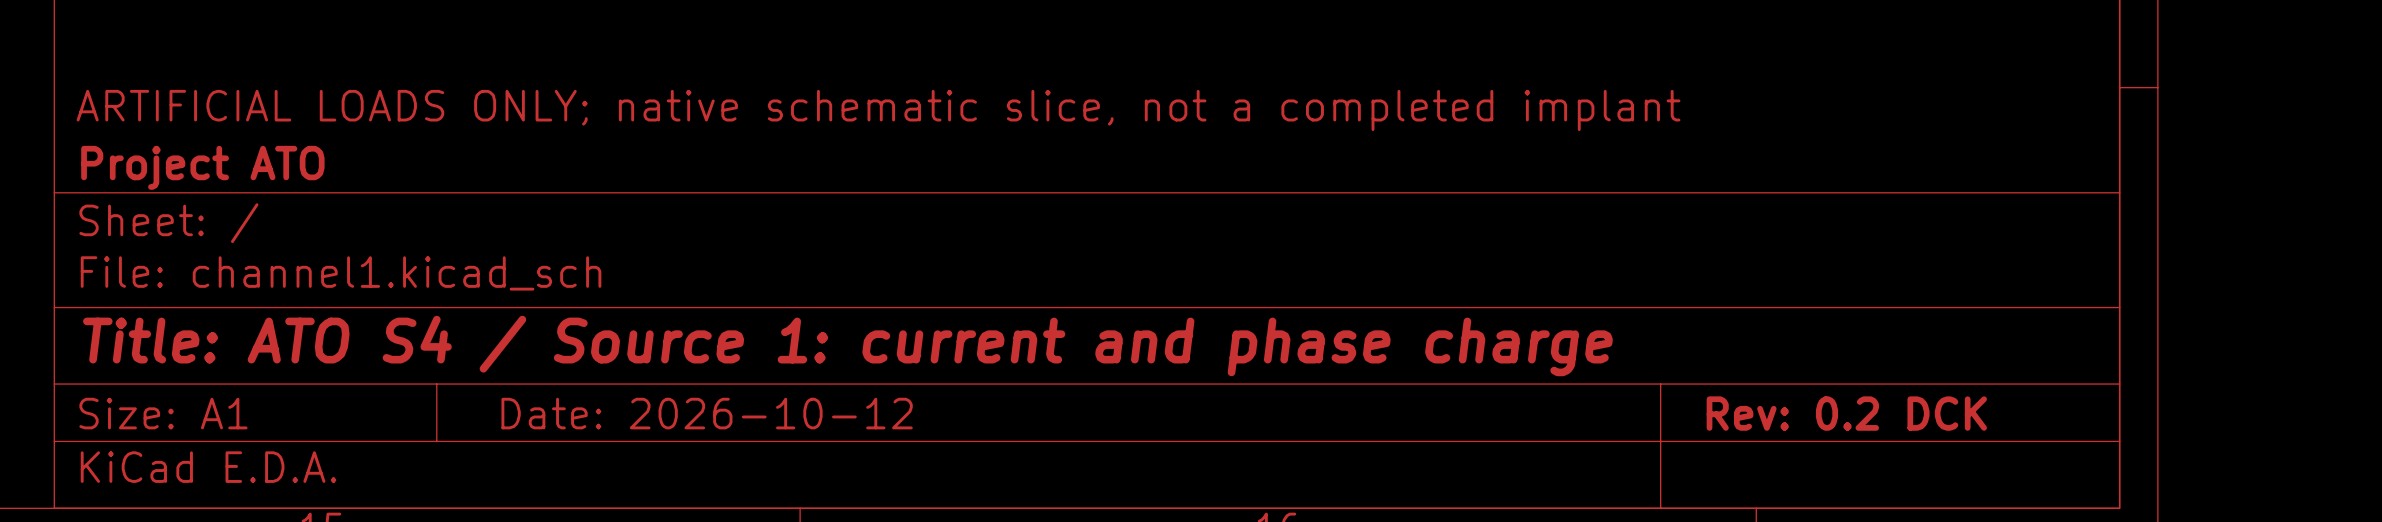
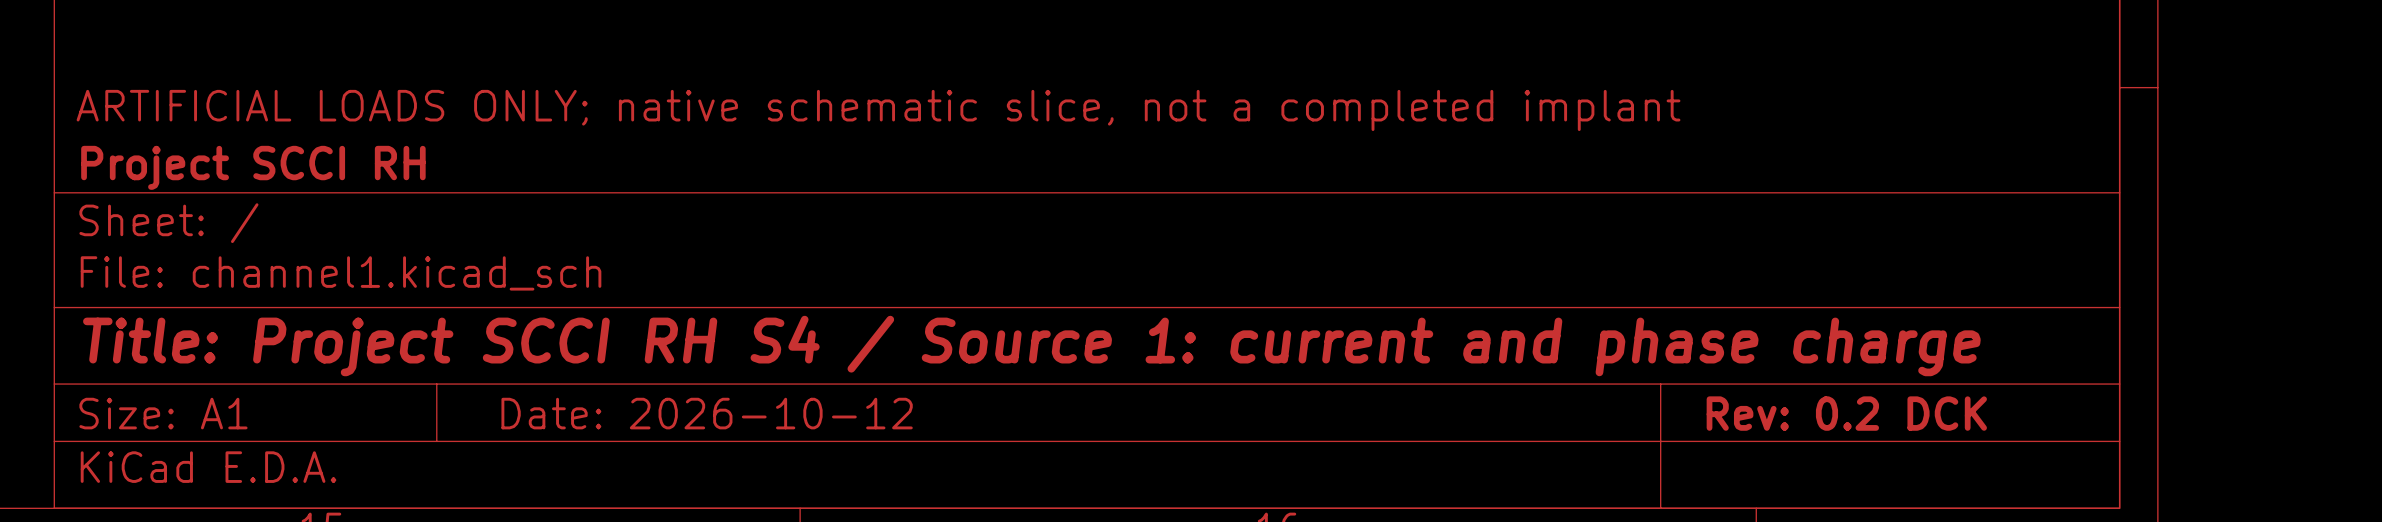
title block: Project ATO (202, 167) -> Project SCCI RH (253, 167)
title block: Title: ATO S4 / Source 1: current and phase charge (847, 346) -> Title: Project SCCI RH S4 / Source 1: current and phase charge (1031, 346)

